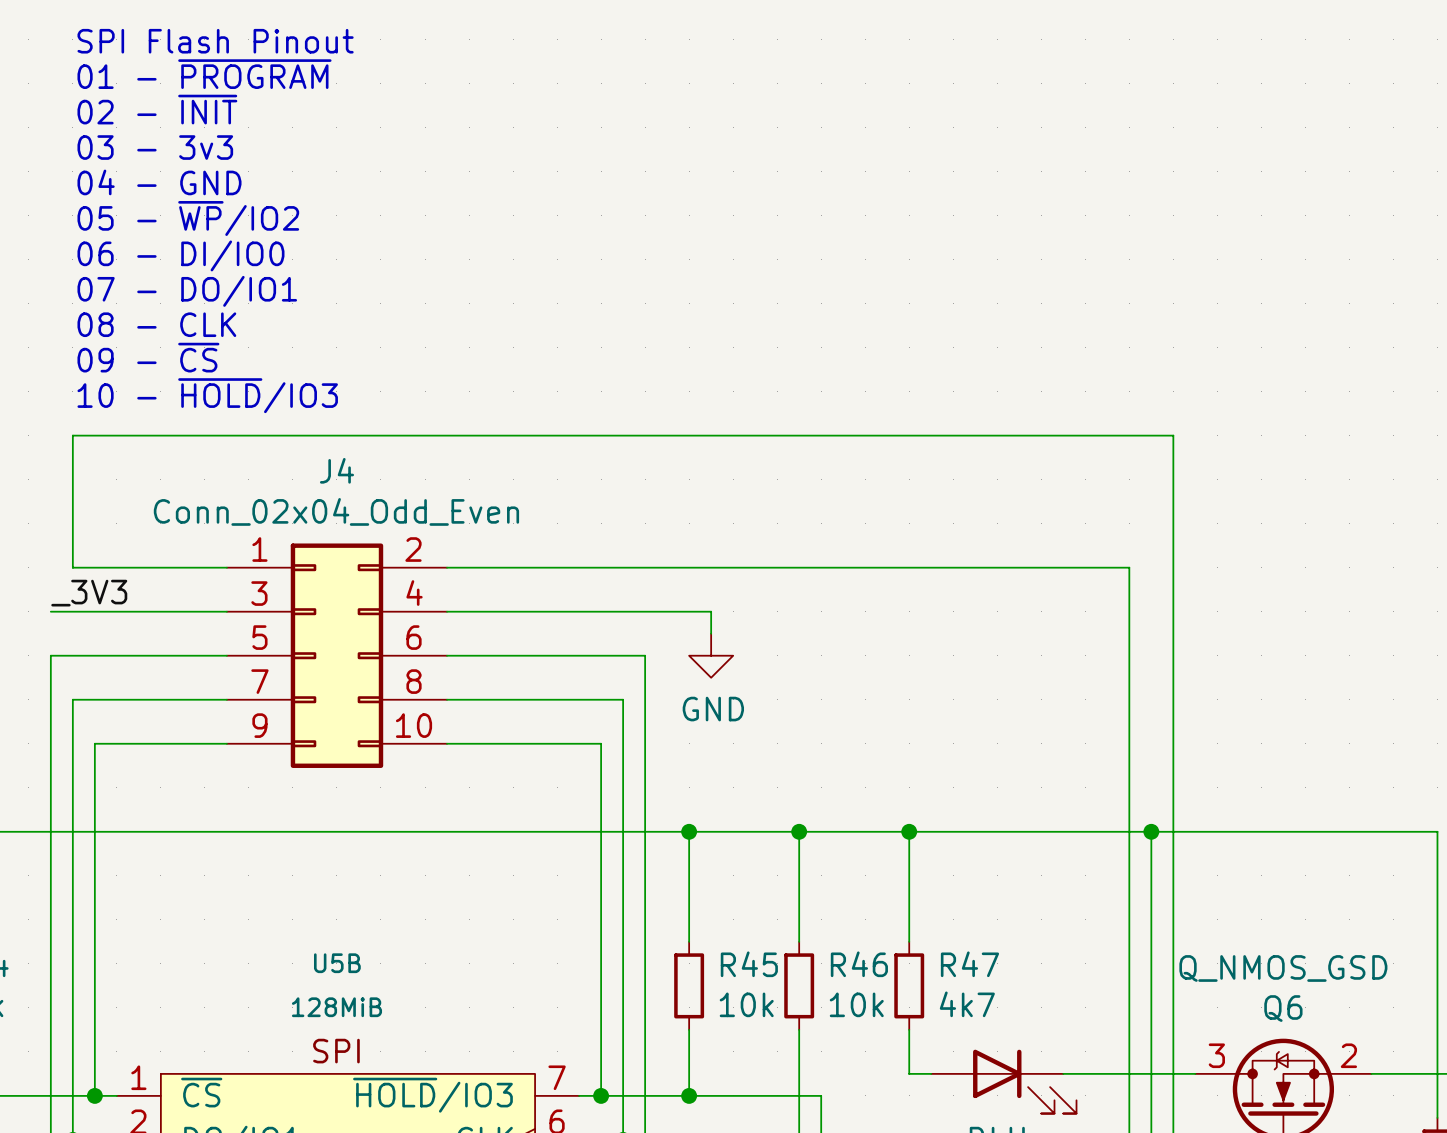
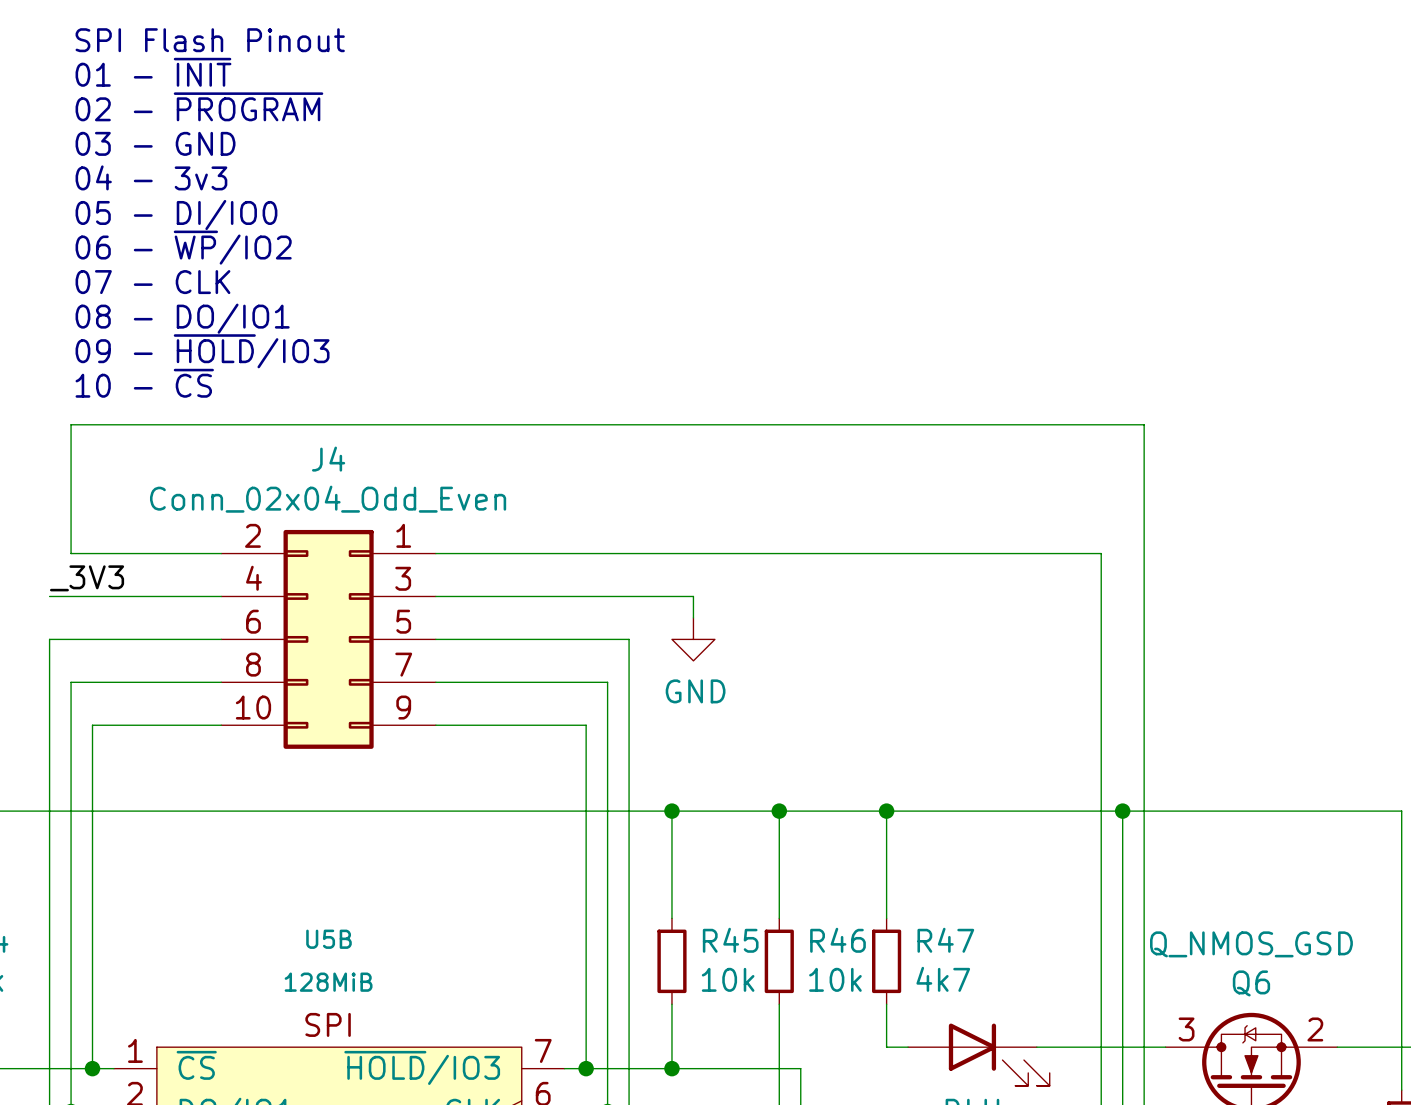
text: 01 - ~{PROGRAM} (204, 74) -> 01 - ~{INIT} (153, 72)
text: 02 - ~{INIT} (157, 109) -> 02 - ~{PROGRAM} (199, 106)
text: 03 - 3v3 (155, 147) -> 03 - GND (155, 143)
text: 04 - GND (159, 182) -> 04 - 3v3 (151, 177)
text: 05 - ~{WP}/IO2 (188, 218) -> 05 - DI/IO0 (176, 215)
text: 06 - DI/IO0 (180, 255) -> 06 - ~{WP}/IO2 (183, 247)
text: 07 - DO/IO1 (187, 291) -> 07 - CLK (152, 282)
text: 08 - CLK (156, 324) -> 08 - DO/IO1 (182, 318)
text: 09 - ~{CS} (148, 357) -> 09 - ~{HOLD}/IO3 (202, 351)
text: 10 - ~{HOLD}/IO3 (207, 395) -> 10 - ~{CS} (144, 383)
J4 flip: as is (336, 655) -> left-right (328, 639)

